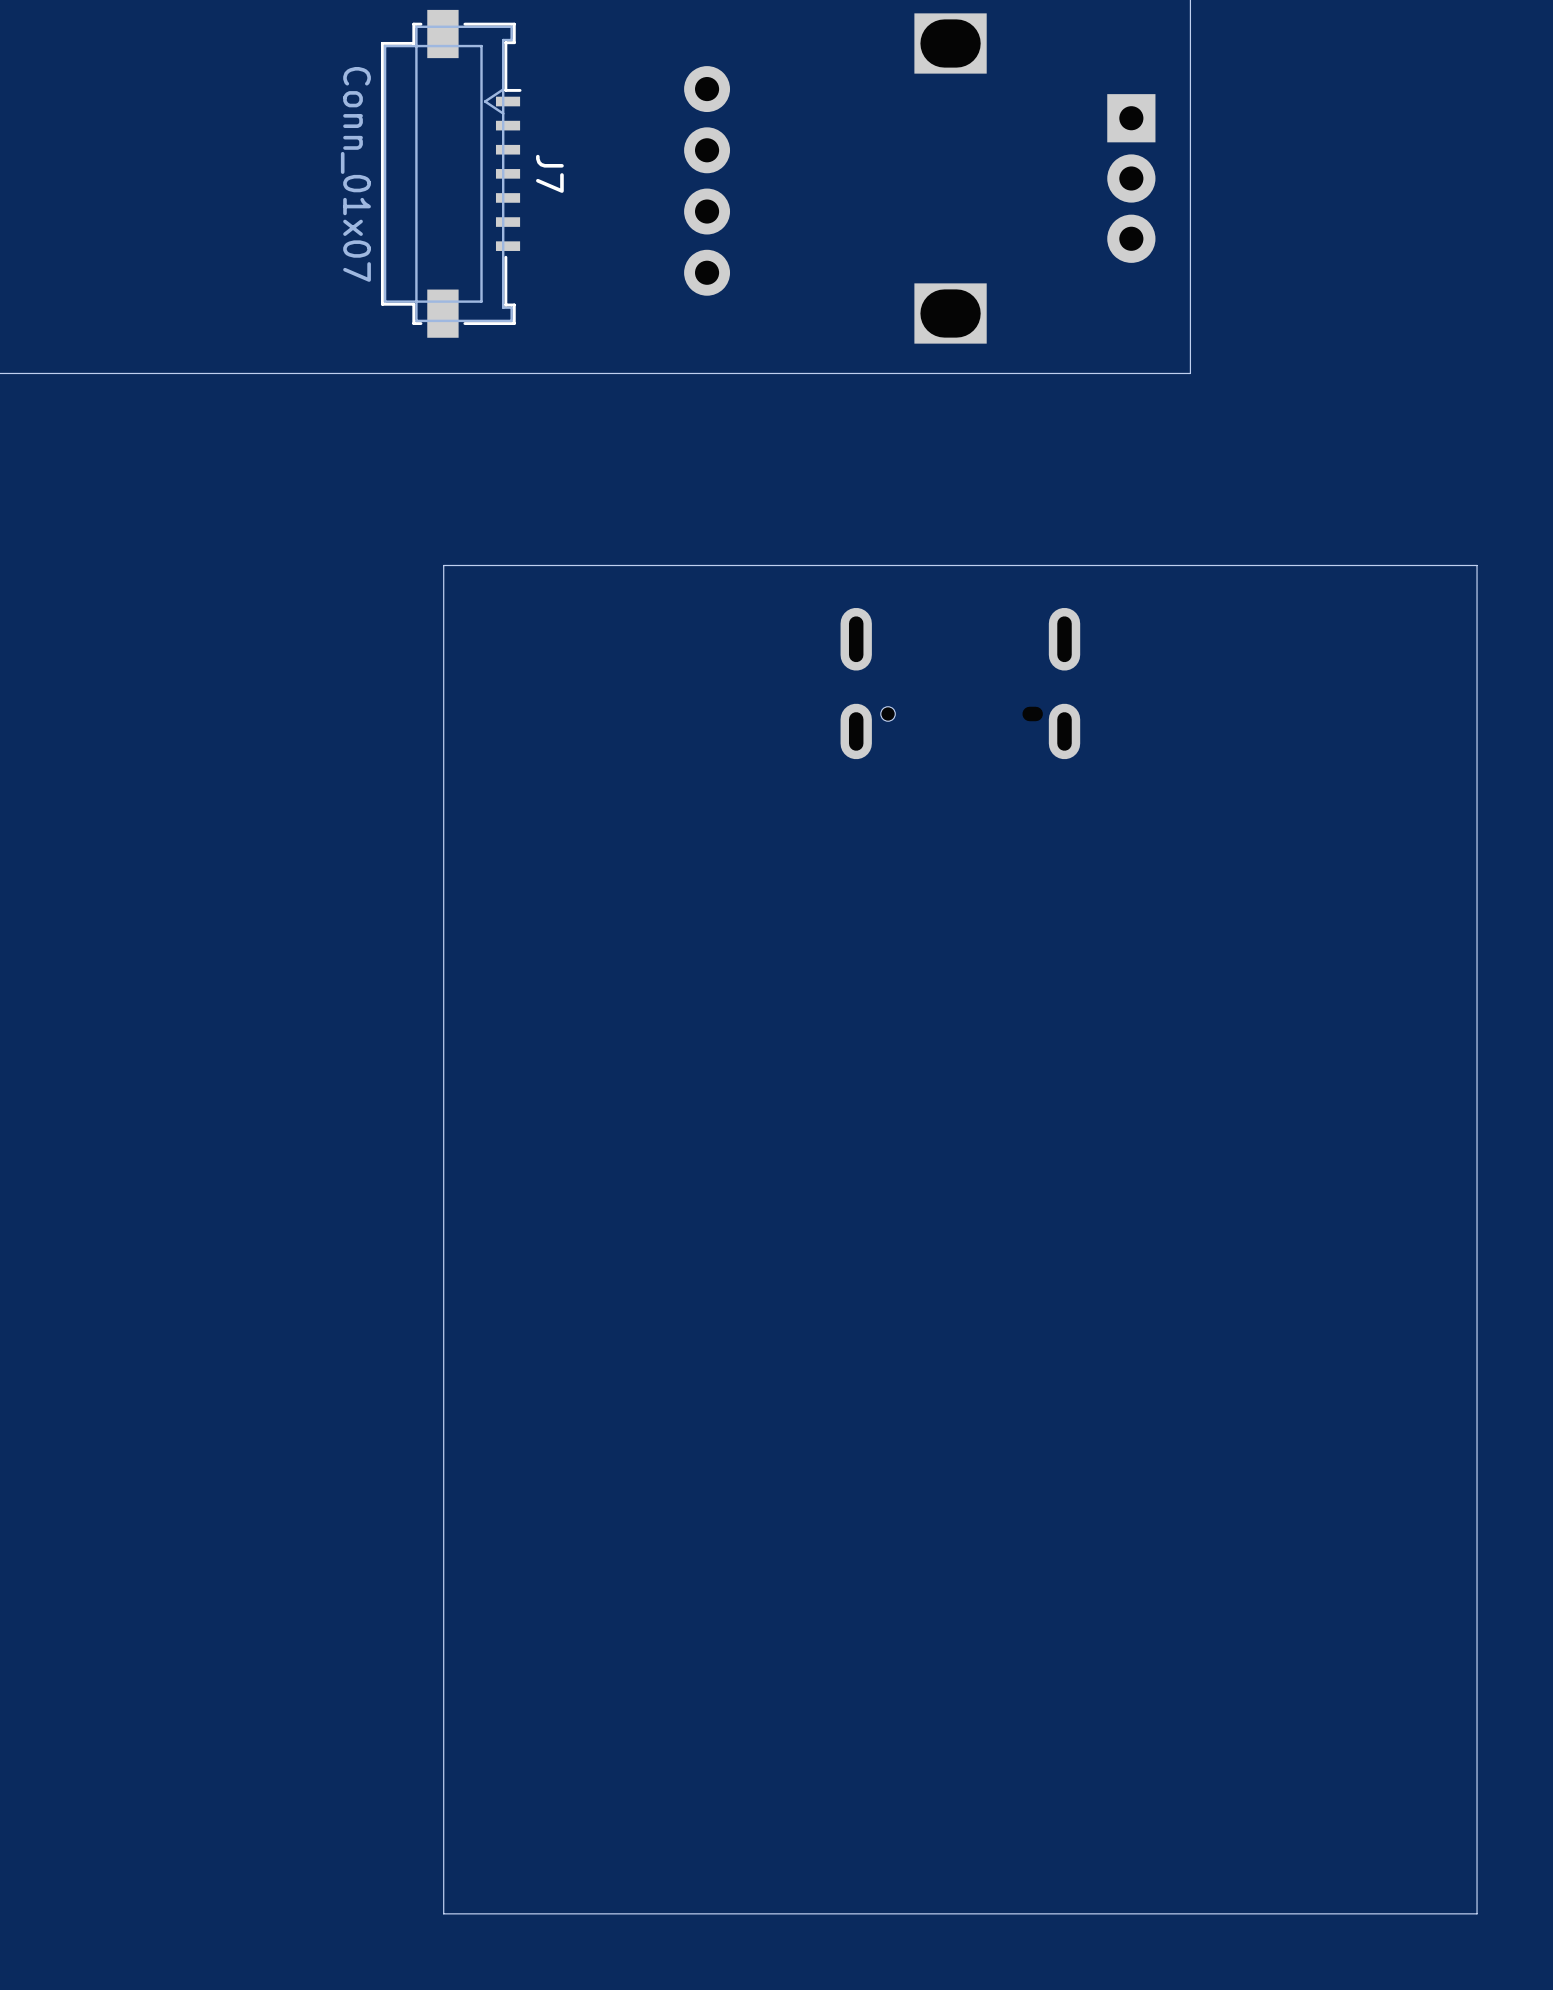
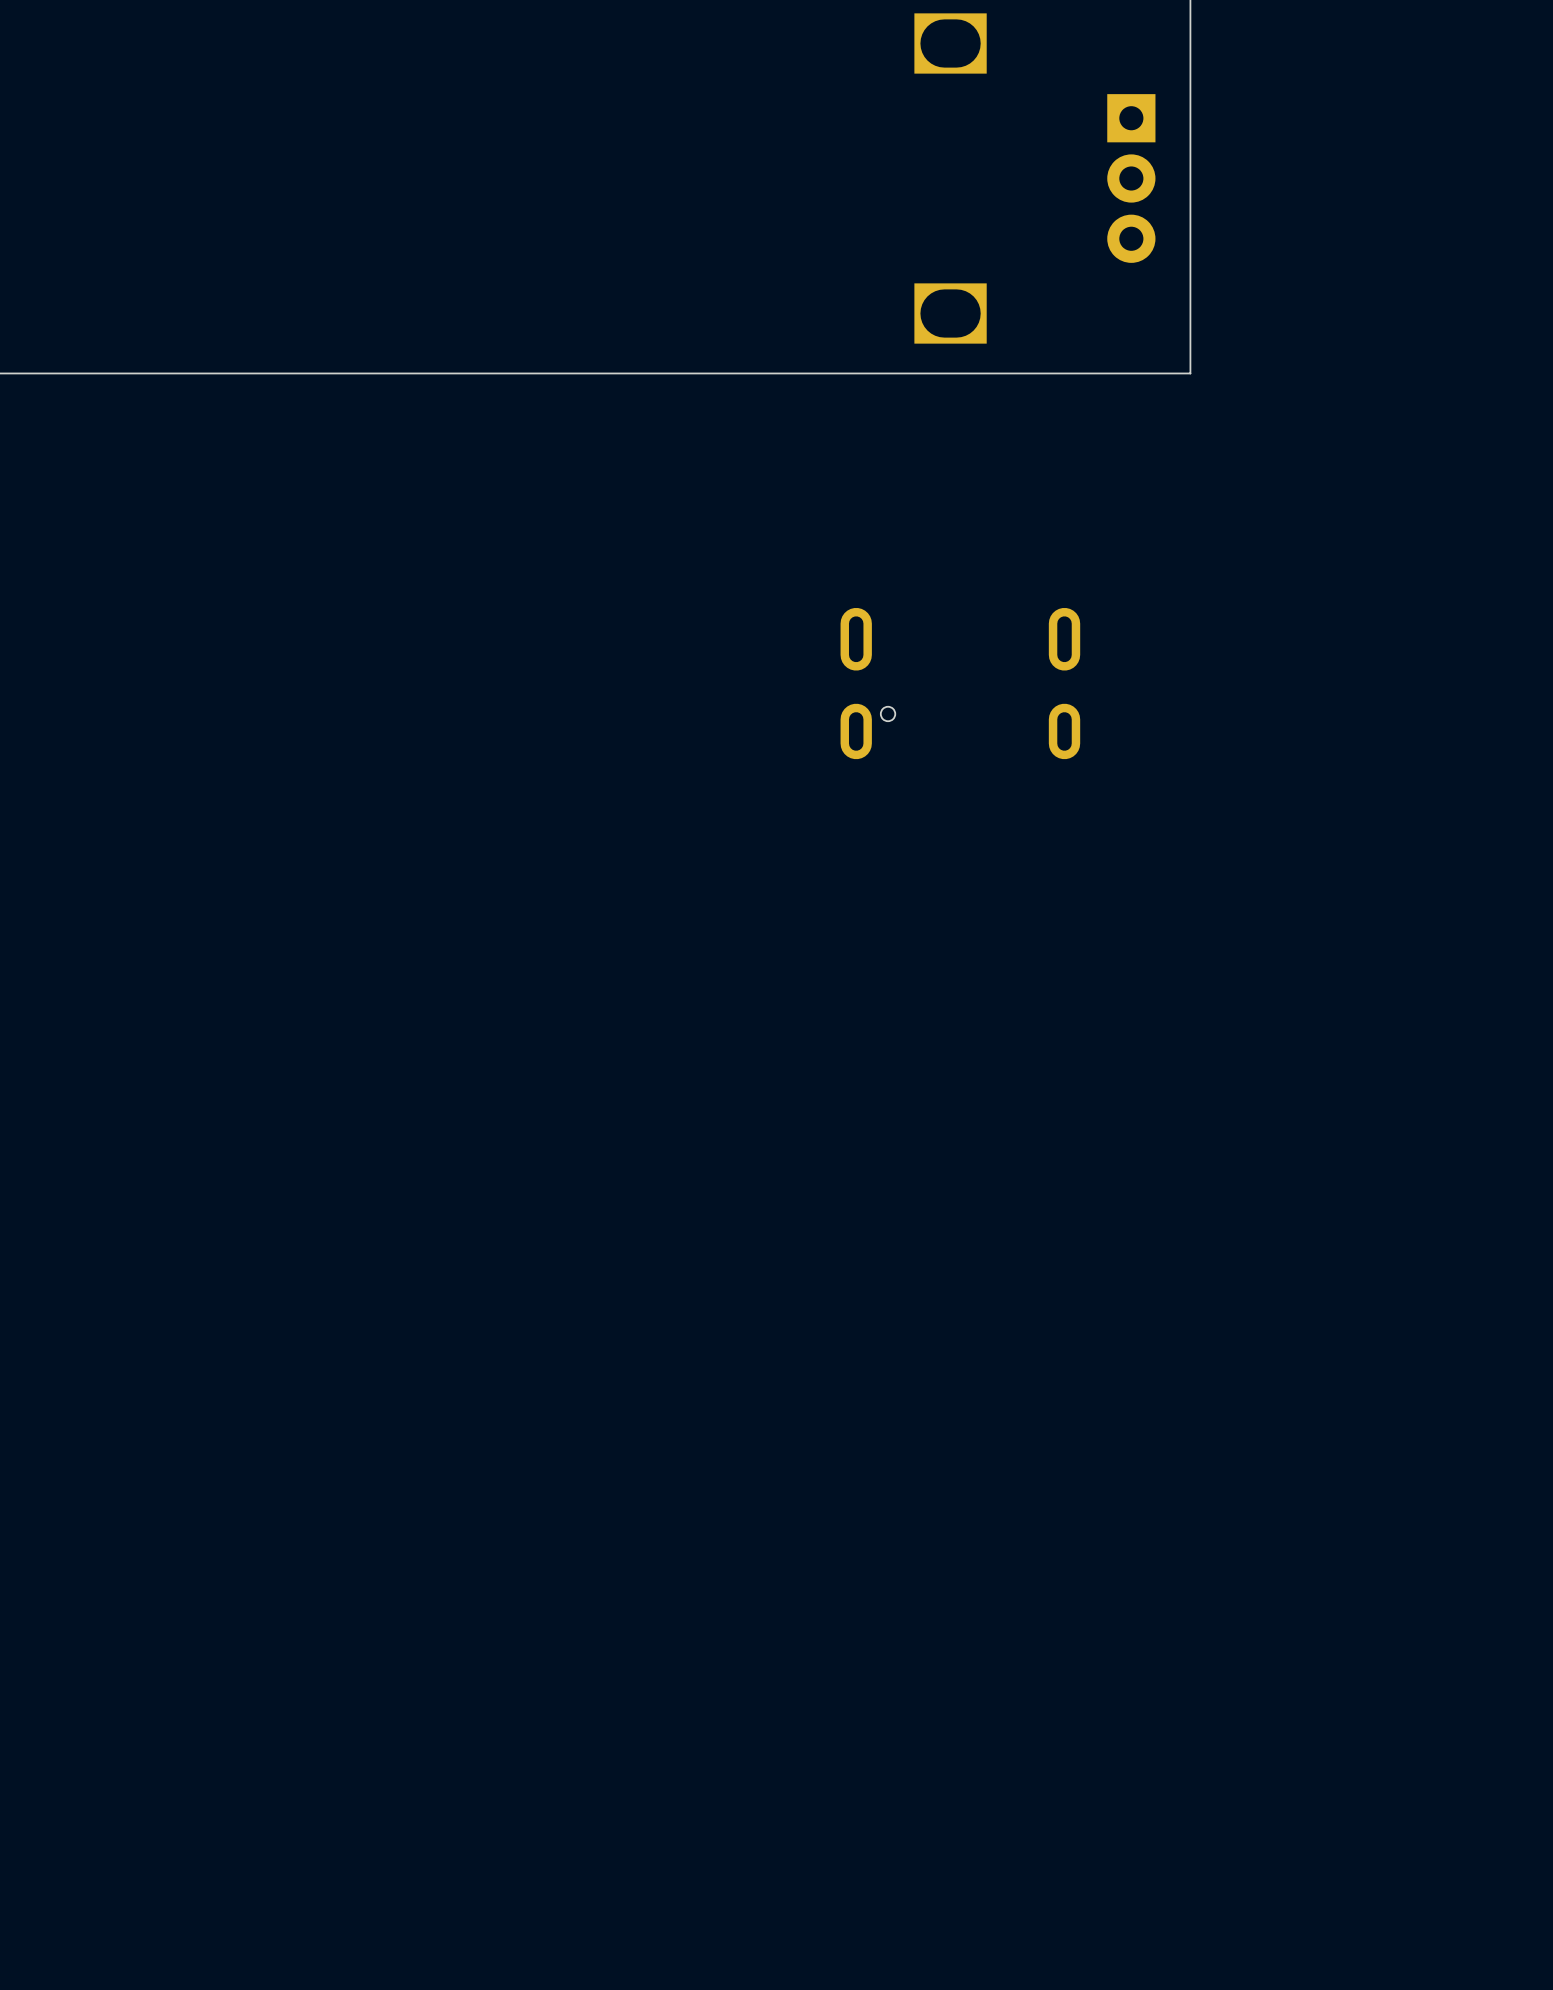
J7: Conn_01x07 (451, 173) -> none
part: (707, 180) -> none
board edge: (1477, 565) (443, 565) (443, 1913) (1477, 1913) (1477, 565) -> none

